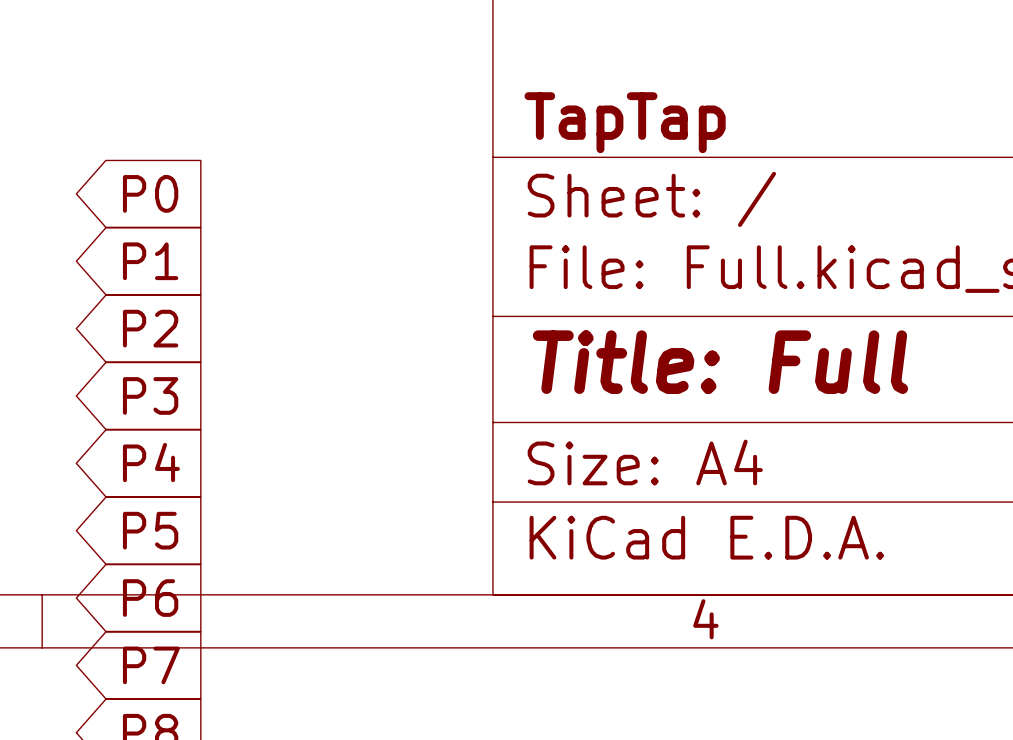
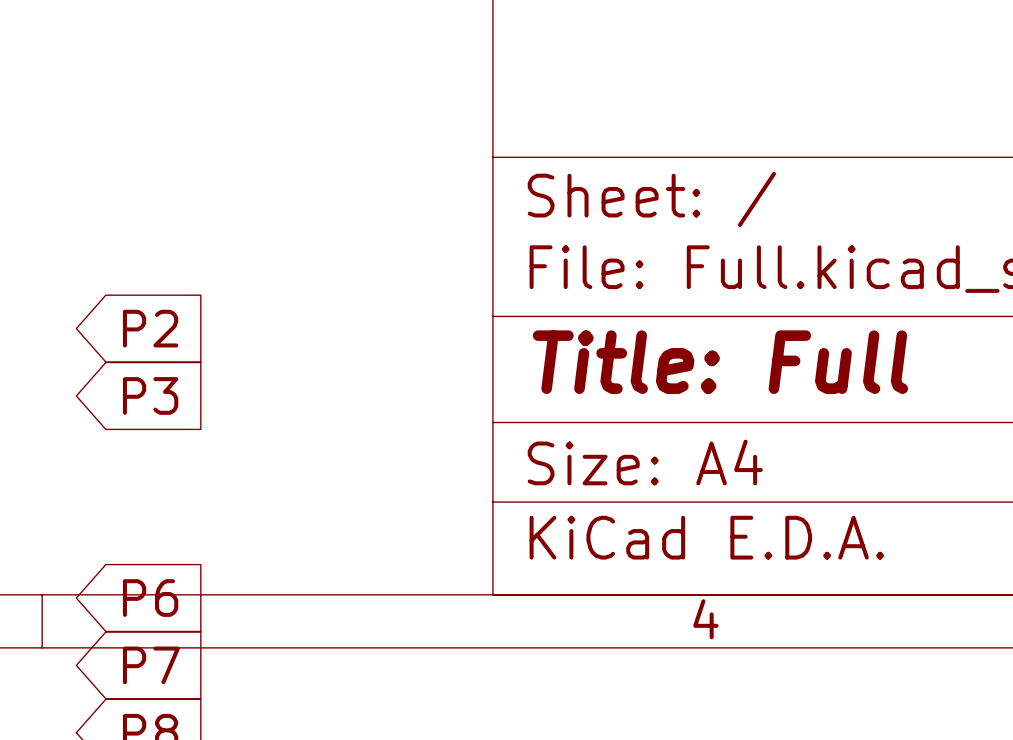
title block: TapTap (625, 122) -> none
global label: P0 (150, 193) -> none
global label: P1 (150, 261) -> none
global label: P4 (151, 462) -> none
global label: P5 (150, 530) -> none

